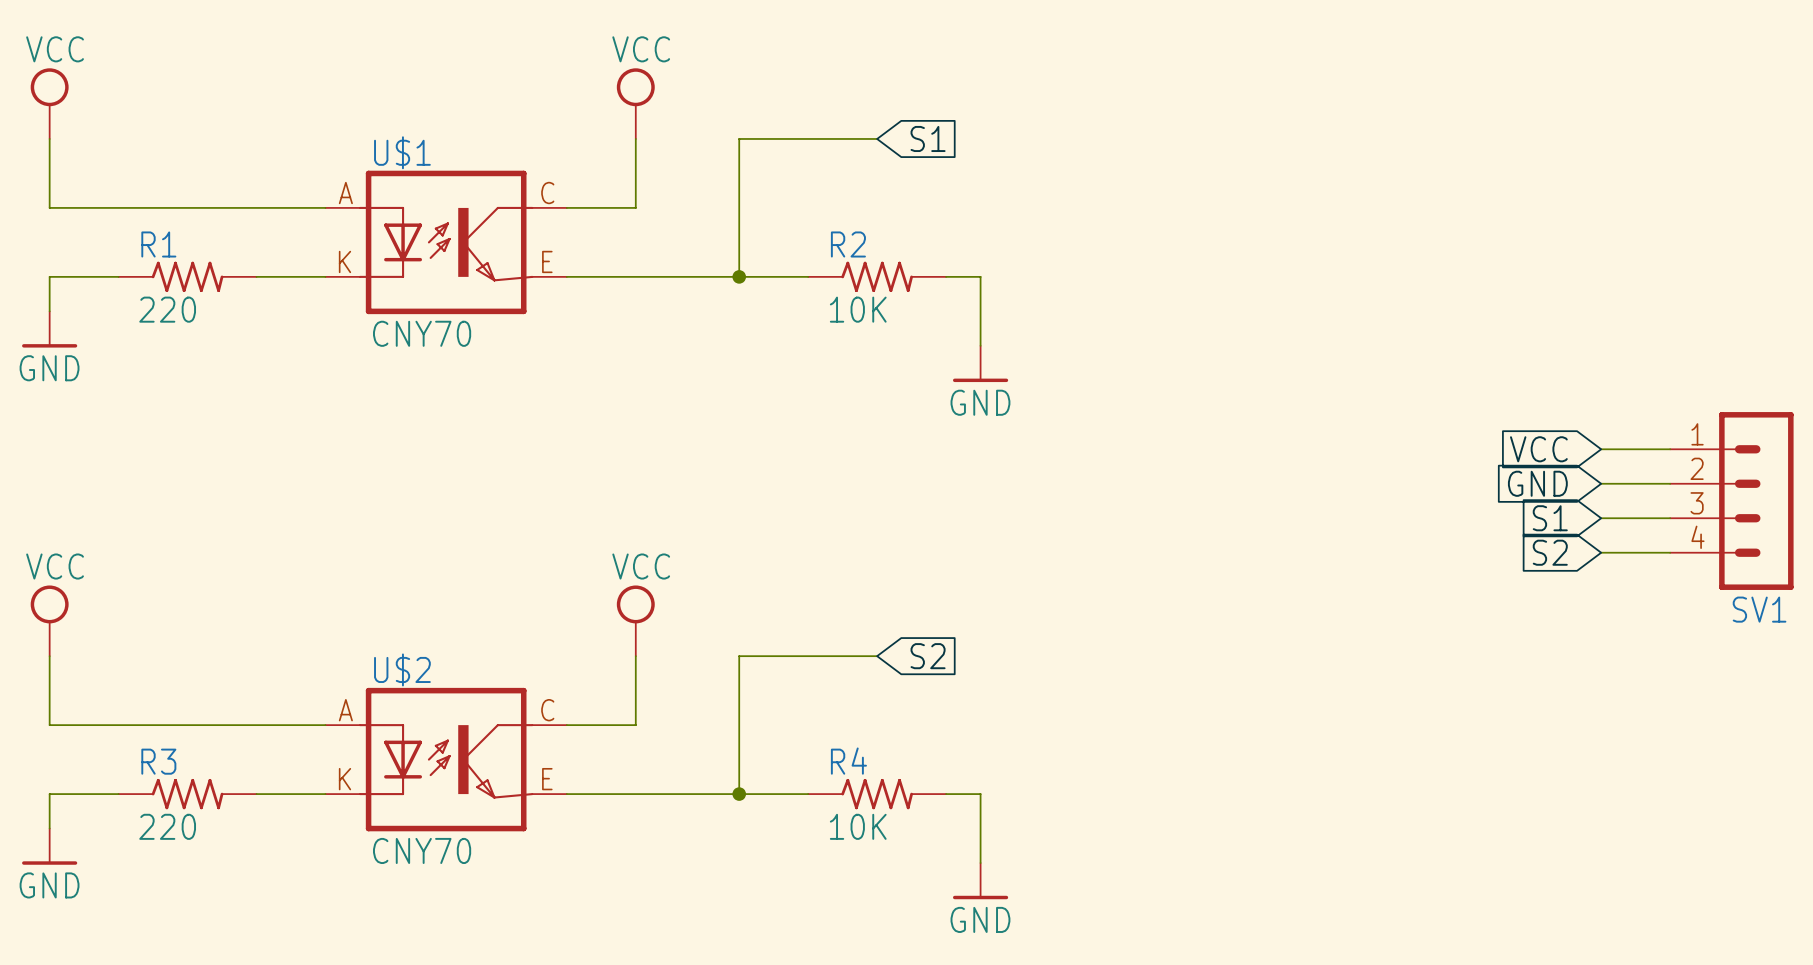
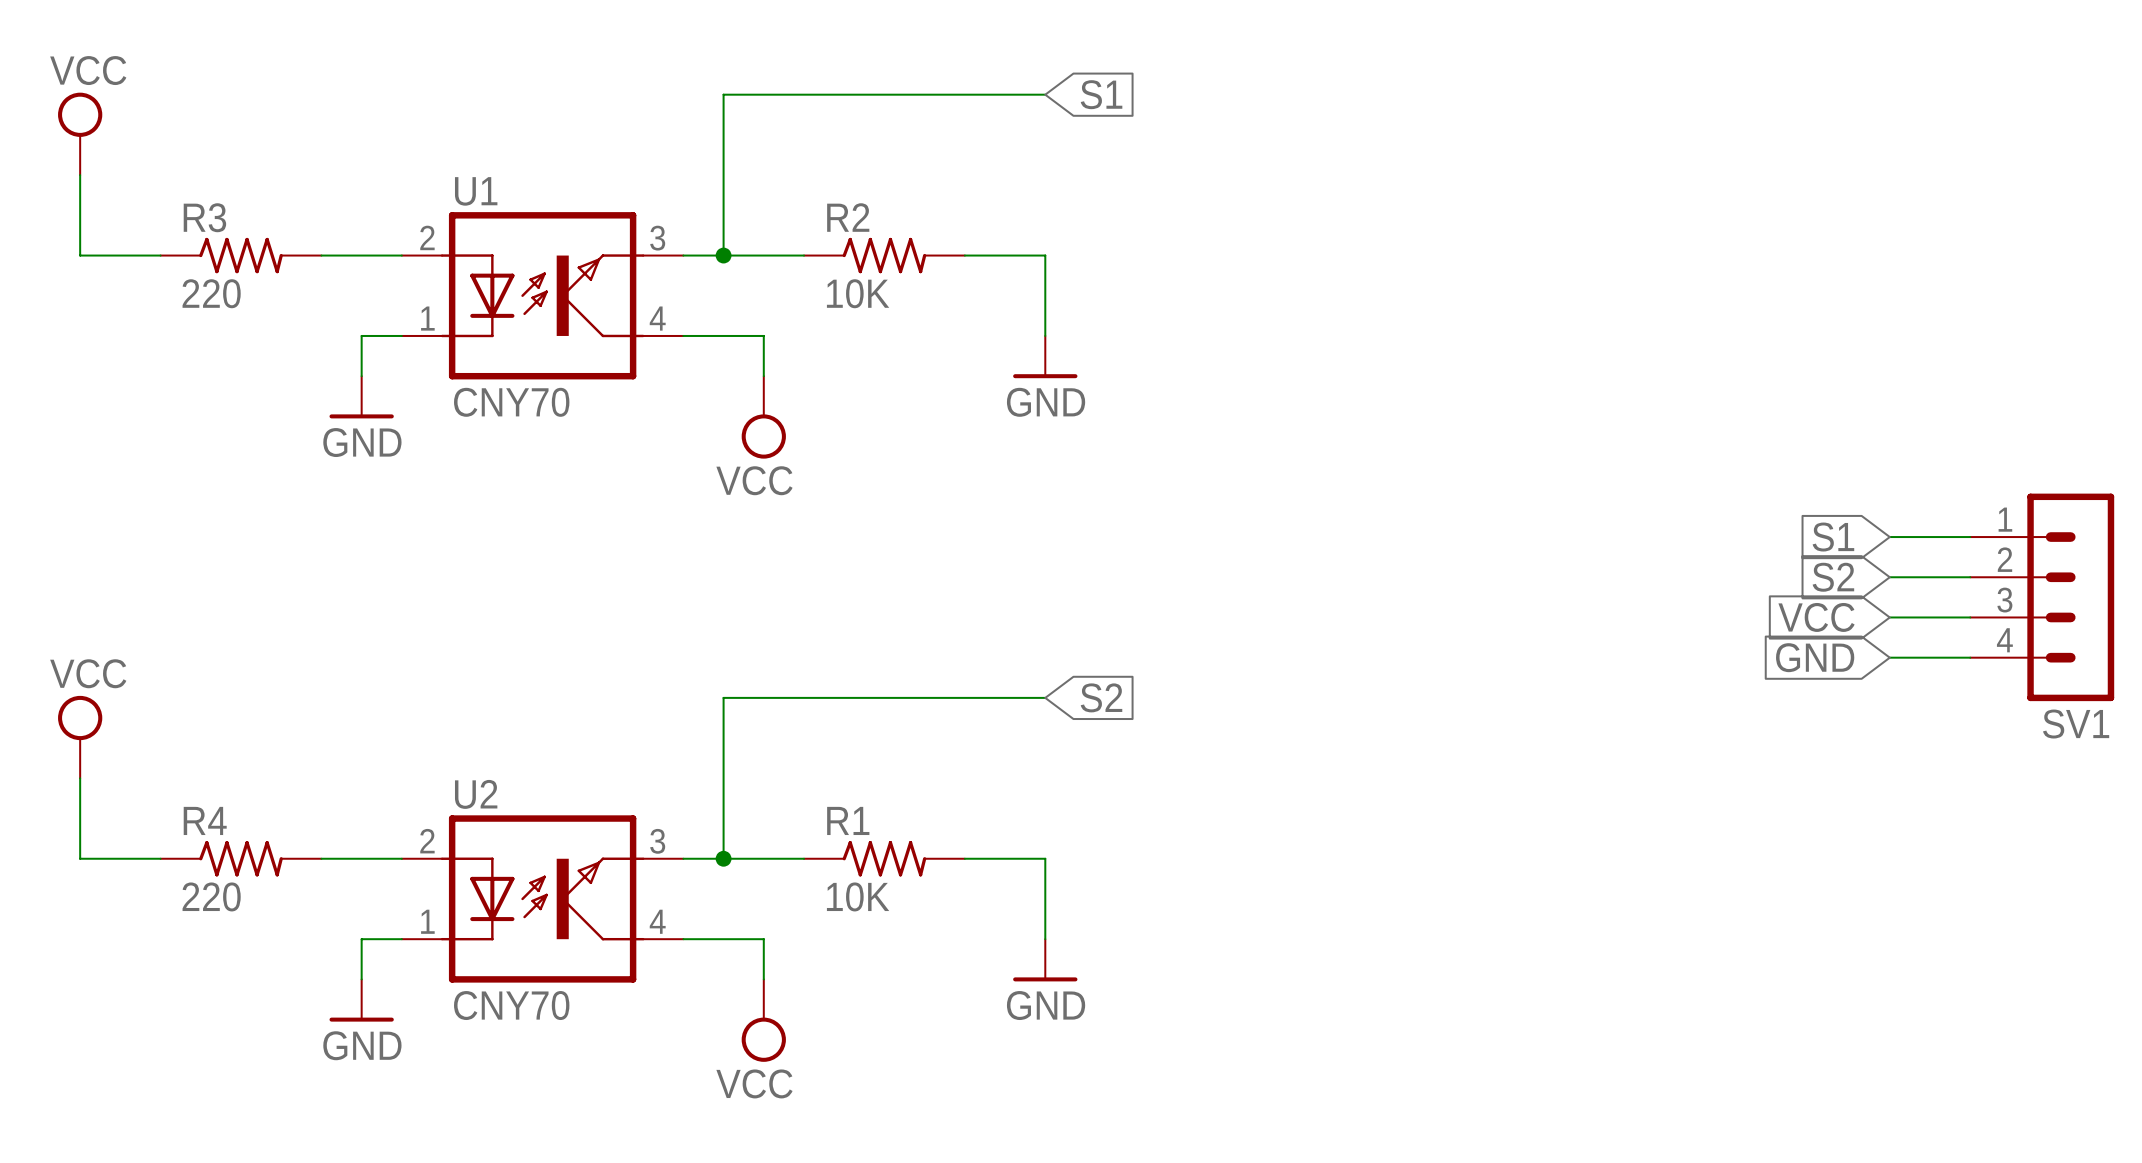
wire: none -> (1045, 94) (723, 94) (723, 255)
power symbol: VCC (635, 103) -> none
wire: (635, 138) (635, 207) -> (804, 255) (763, 255)
wire: (877, 138) (739, 138) (739, 276) -> none
global label position: S1 (928, 138) -> S1 (1101, 94)
junction: none -> (723, 255)
wire: none -> (964, 255) (1045, 255) (1045, 335)
U$1: CNY70 (446, 242) -> none
U1: none -> CNY70 (542, 295)
wire: (118, 276) (49, 276) (49, 311) -> none
R1 position: (187, 276) -> (884, 858)
wire: (256, 276) (291, 276) -> (361, 376) (361, 335)
wire: (635, 276) (808, 276) -> (763, 335) (763, 376)
junction: (739, 276) -> none
R2 position: (877, 276) -> (884, 255)
wire: (946, 276) (980, 276) (980, 345) -> none
R1 value: 220 (167, 309) -> 10K (858, 896)
power symbol position: GND (49, 329) -> GND (361, 397)
power symbol: none -> VCC (763, 417)
power symbol position: GND (980, 363) -> GND (1045, 357)
global label: VCC (1538, 449) -> S1 (1833, 537)
global label: GND (1537, 483) -> S2 (1833, 577)
global label: S1 (1550, 518) -> VCC (1816, 617)
global label: S2 (1550, 552) -> GND (1815, 657)
wire: none -> (1045, 697) (723, 697) (723, 858)
power symbol: VCC (635, 620) -> none
wire: (635, 656) (635, 725) -> (804, 858) (763, 858)
wire: (877, 656) (739, 656) (739, 794) -> none
global label position: S2 (928, 656) -> S2 (1101, 697)
junction: none -> (723, 858)
wire: none -> (964, 858) (1045, 858) (1045, 939)
U$2: CNY70 (446, 759) -> none
U2: none -> CNY70 (542, 898)
wire: (118, 794) (49, 794) (49, 828) -> none
R3 position: (187, 794) -> (241, 255)
wire: (256, 794) (291, 794) -> (361, 979) (361, 939)
wire: (635, 794) (808, 794) -> (763, 939) (763, 979)
junction: (739, 794) -> none
R4 position: (877, 794) -> (241, 858)
wire: (946, 794) (980, 794) (980, 863) -> none
R4 value: 10K (858, 826) -> 220 (211, 896)
power symbol position: GND (49, 846) -> GND (361, 1000)
power symbol: none -> VCC (763, 1020)
power symbol position: GND (980, 881) -> GND (1045, 960)

